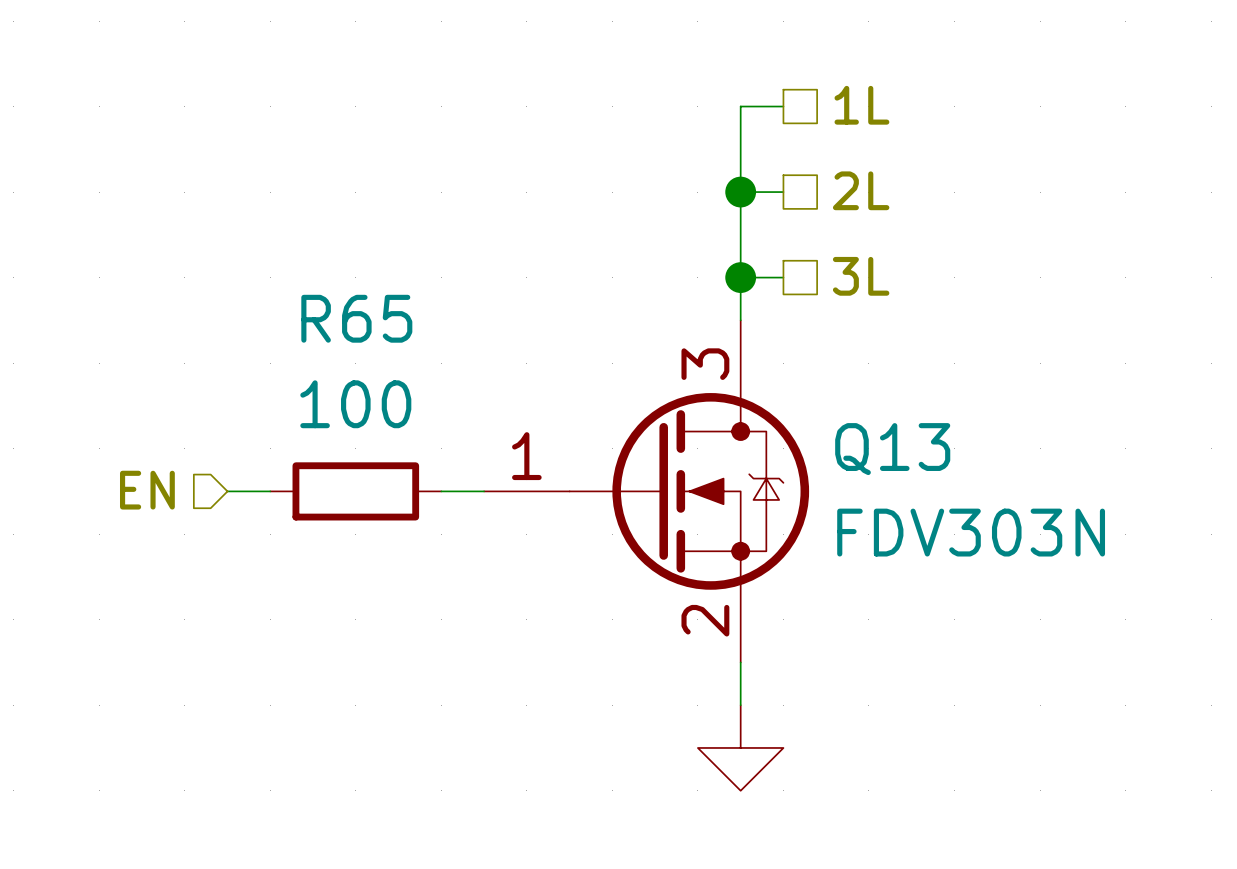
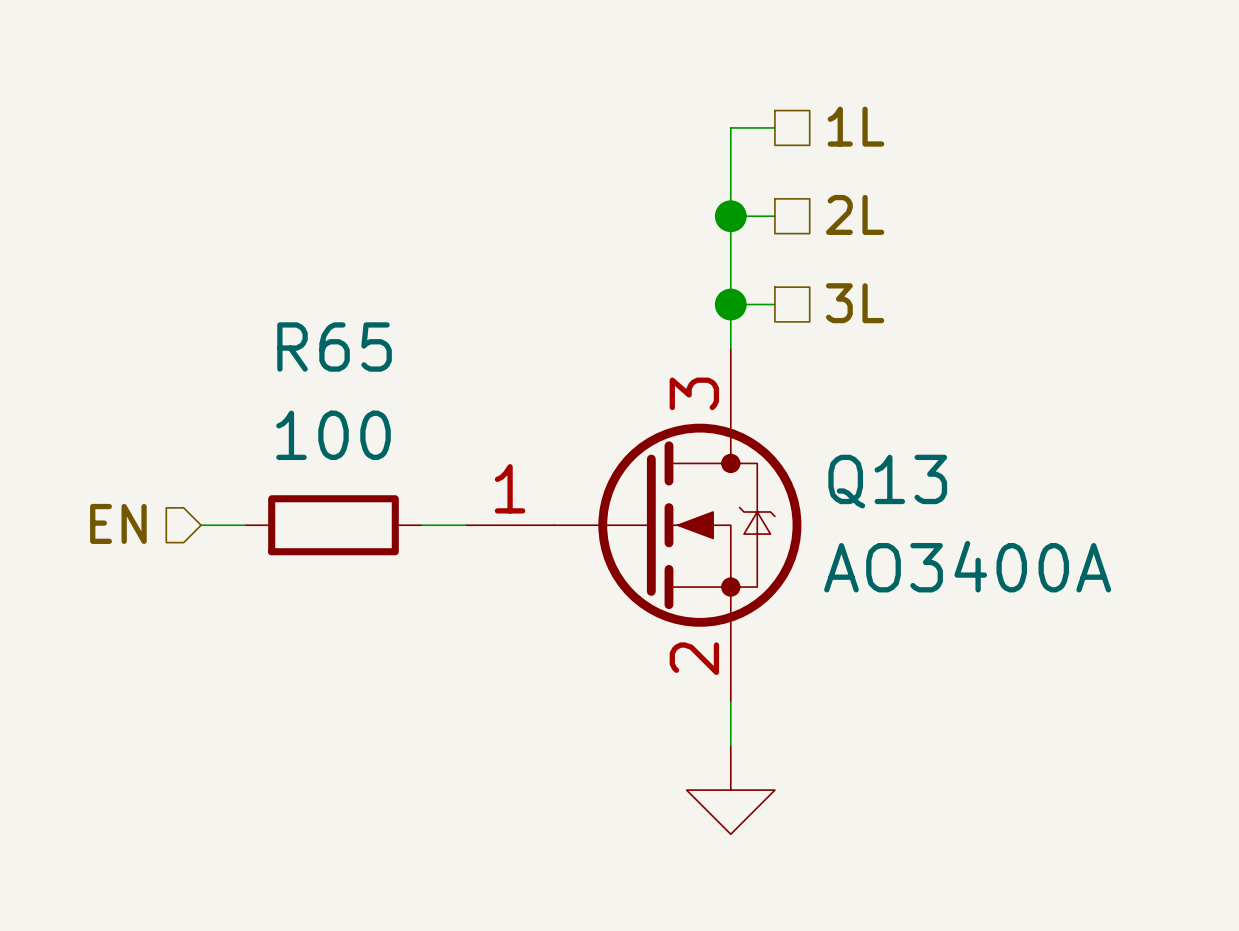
Q13 value: FDV303N (971, 532) -> AO3400A (967, 566)

